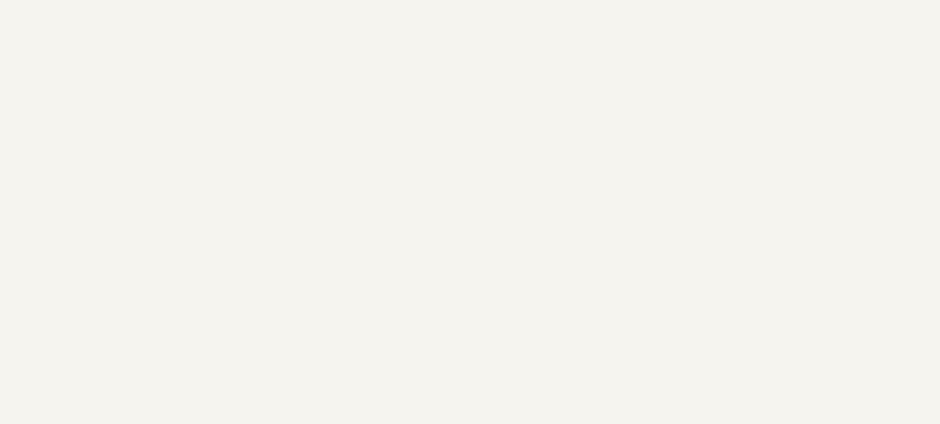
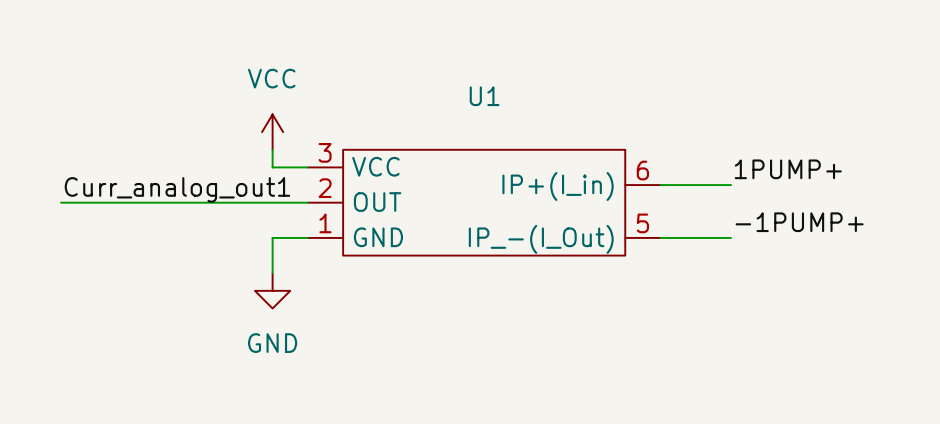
power symbol: none -> VCC (272, 132)
wire: none -> (272, 149) (272, 167) (307, 167)
label: none -> 1PUMP+ (788, 169)
wire: none -> (660, 185) (731, 185)
label: none -> Curr_analog_out1 (177, 189)
wire: none -> (61, 202) (307, 202)
U1: none -> (484, 202)
label: none -> -1PUMP+ (799, 222)
wire: none -> (307, 237) (272, 237) (272, 273)
wire: none -> (660, 237) (731, 237)
power symbol: none -> GND (272, 290)

